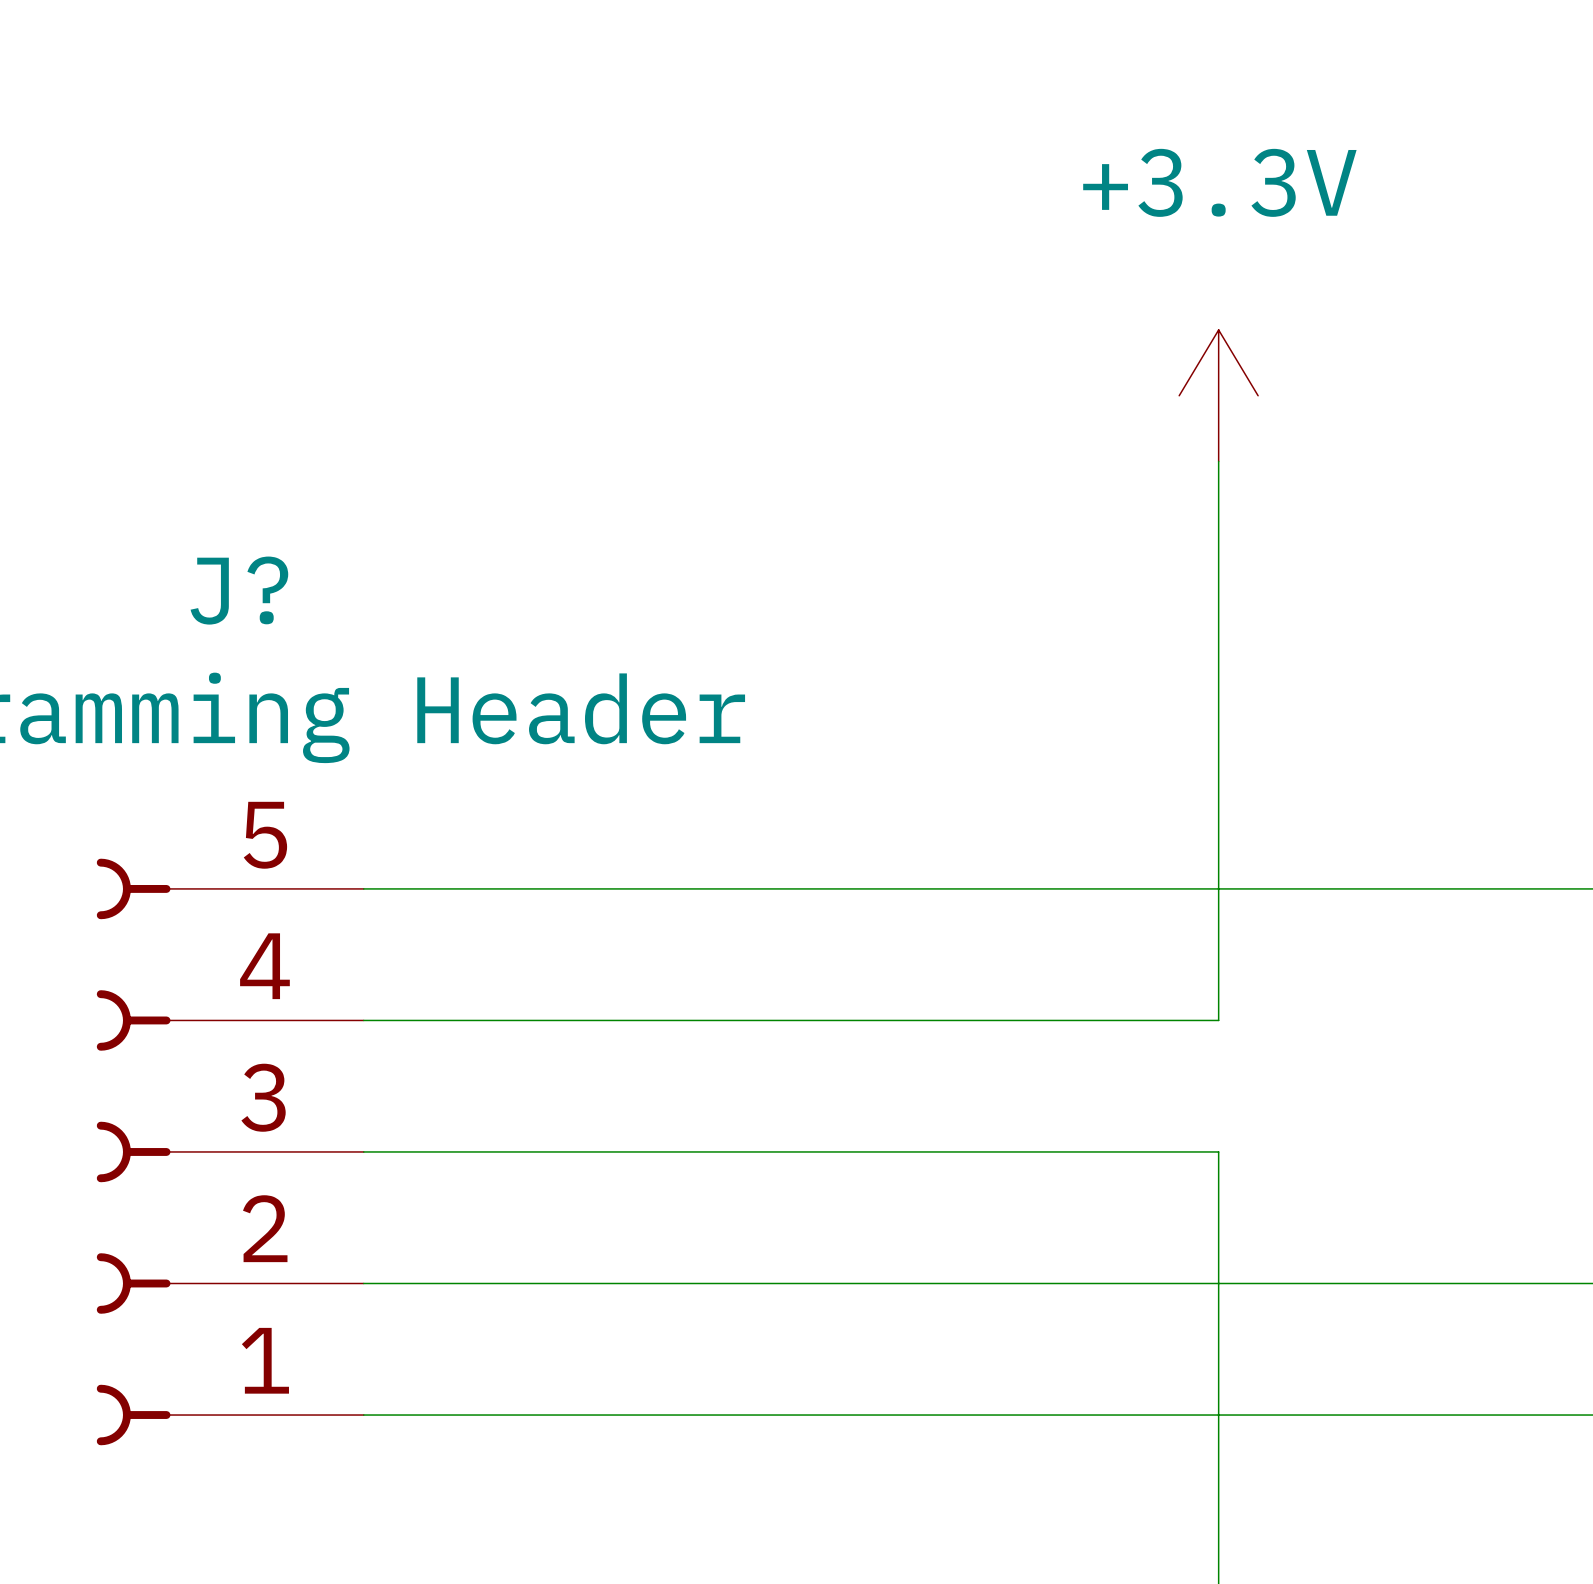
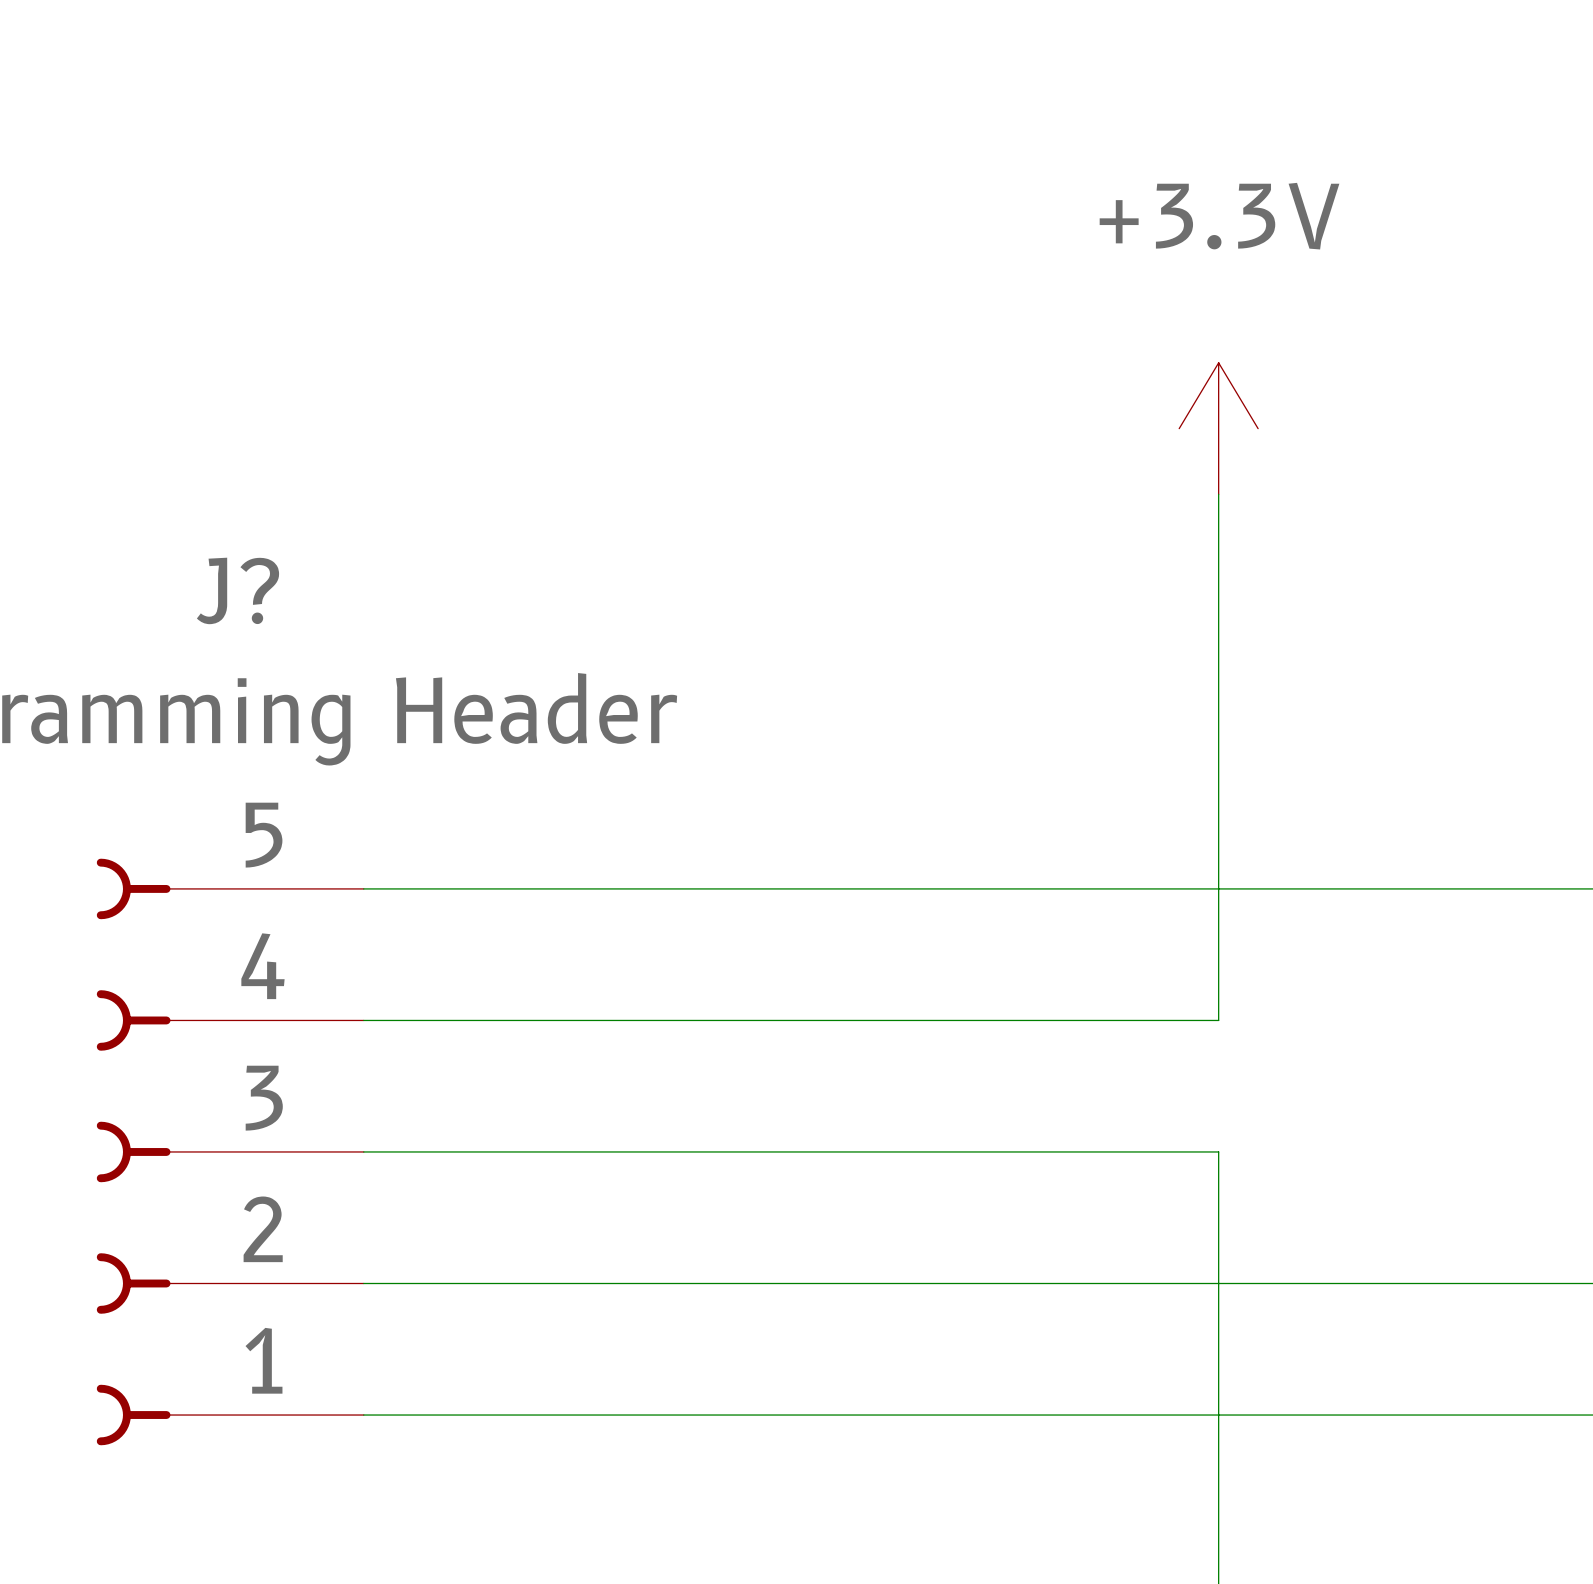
power symbol position: +3.3V (1218, 395) -> +3.3V (1218, 428)

